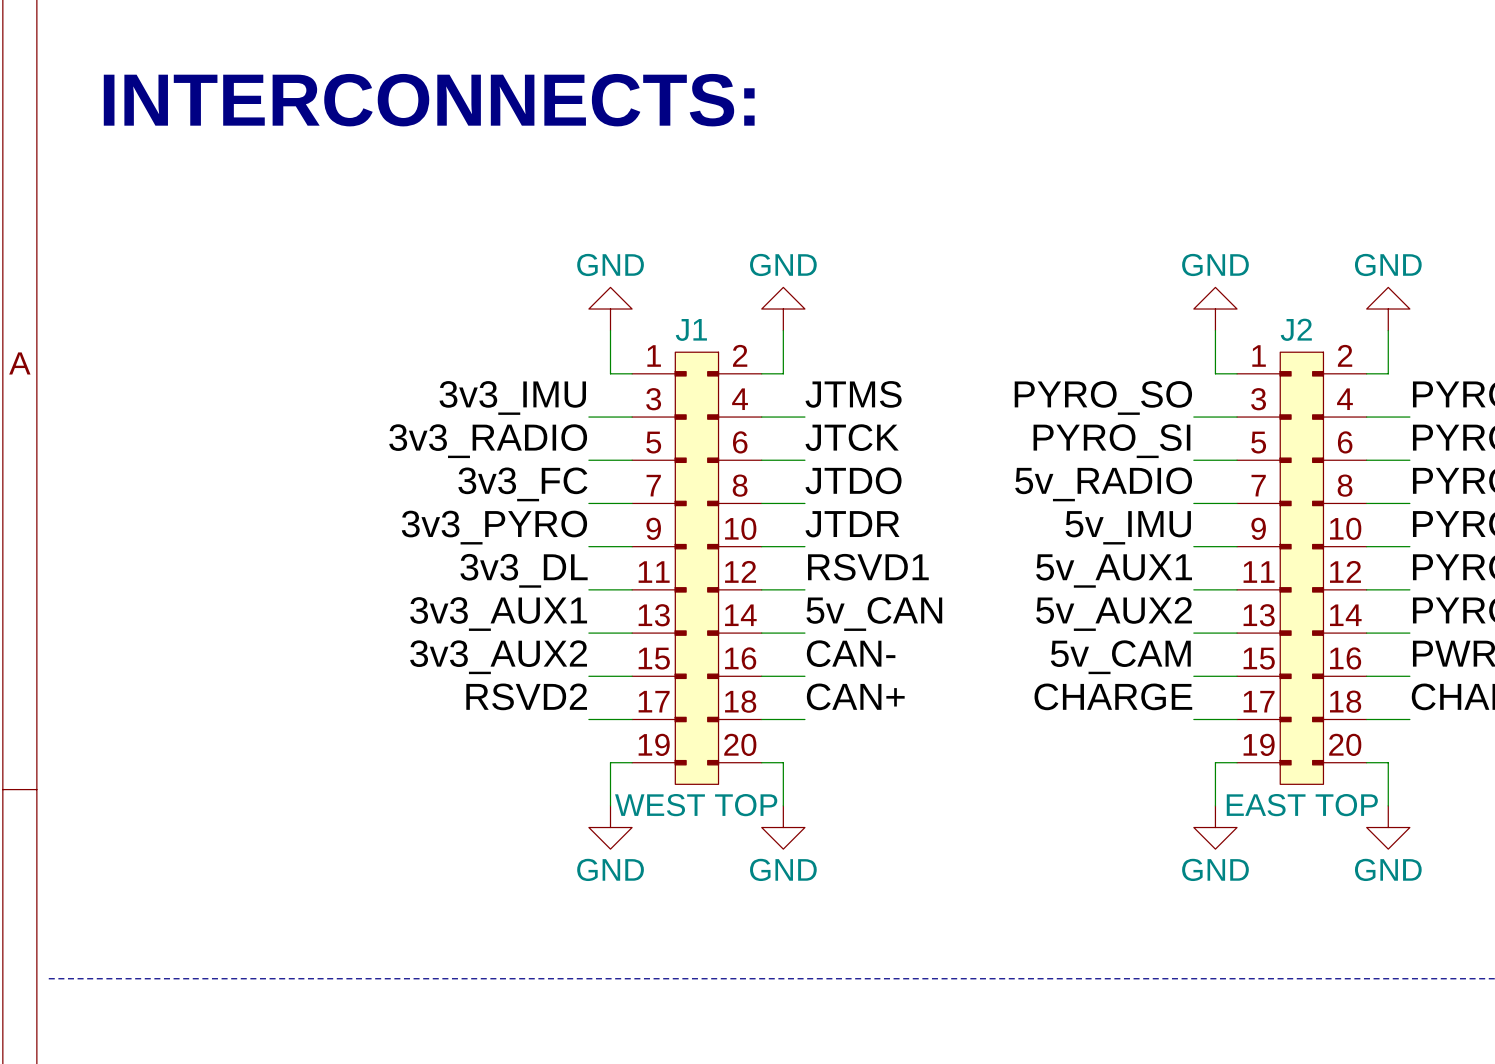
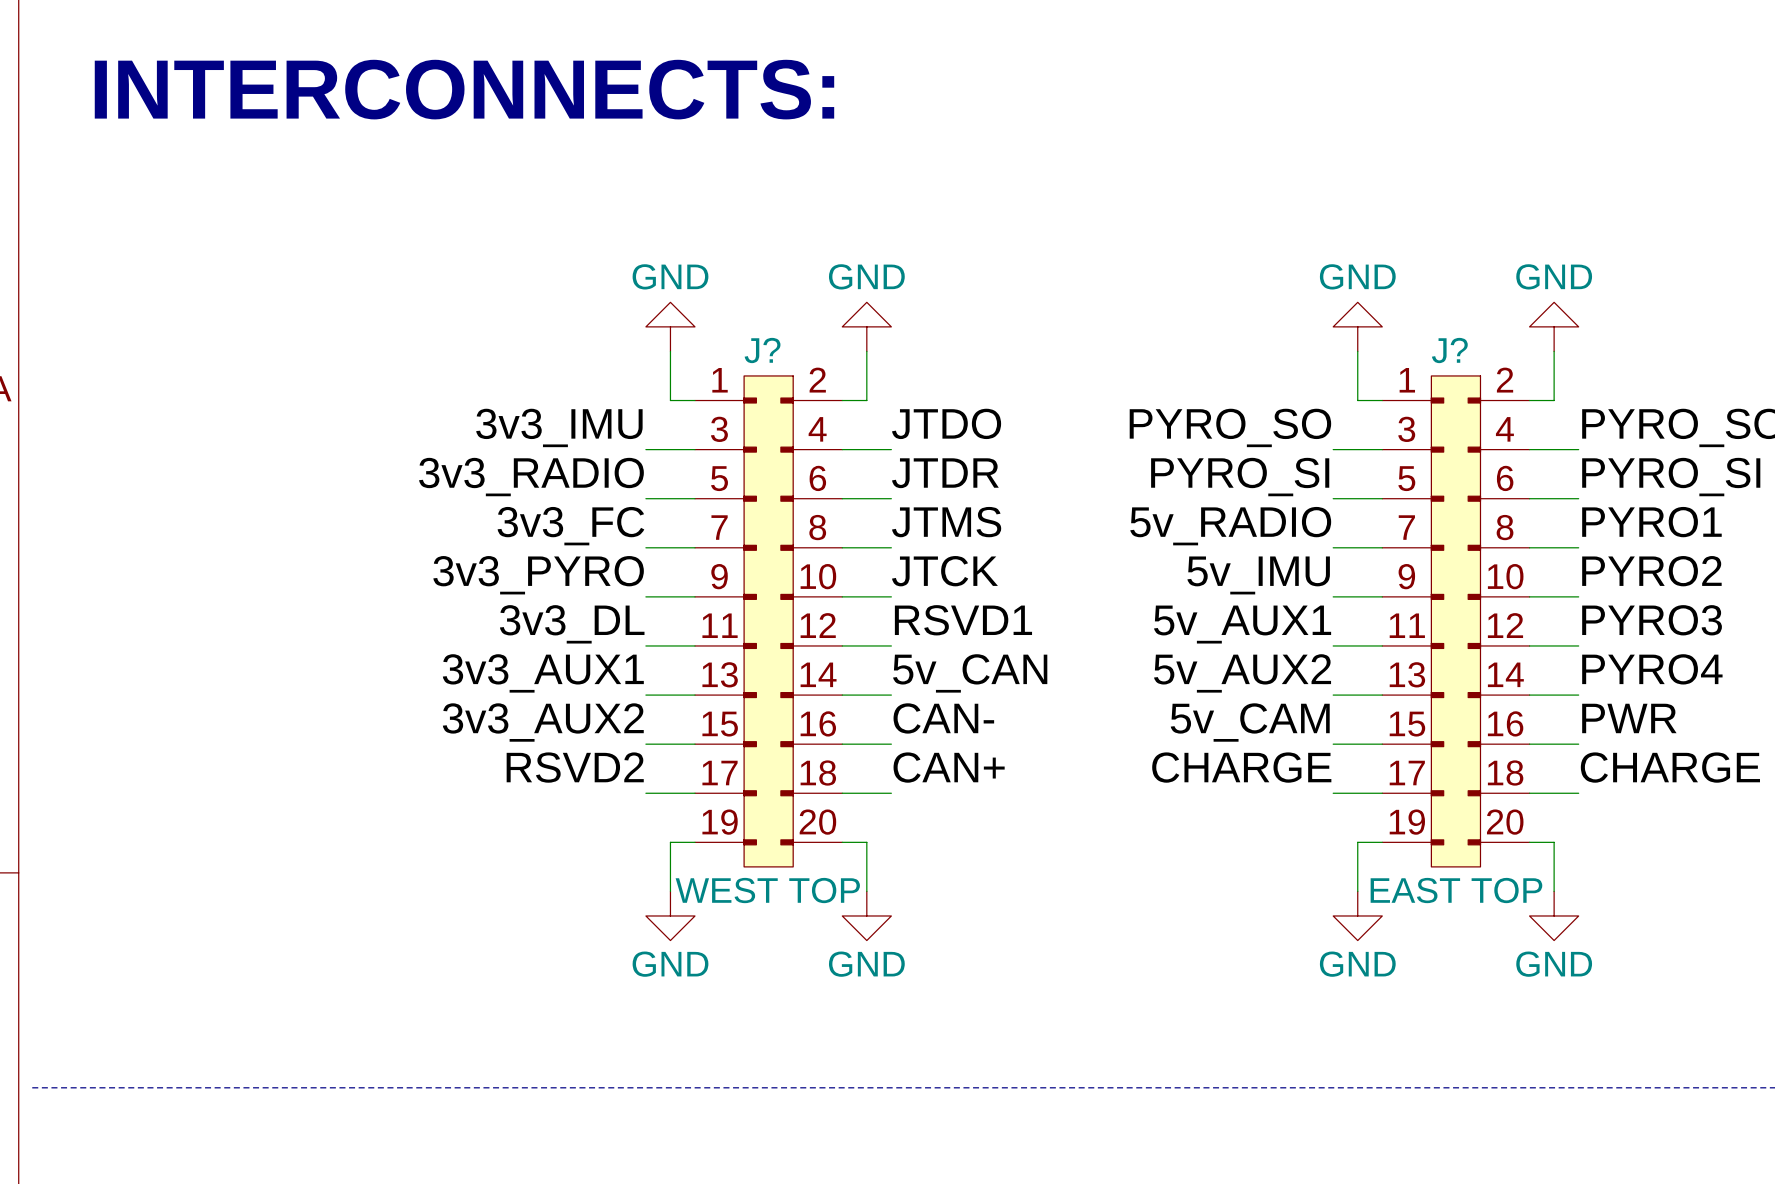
J1 name: J1 (691, 329) -> J? (762, 350)
J2 name: J2 (1296, 329) -> J? (1449, 350)
label: JTMS (853, 394) -> JTDO (946, 423)
label: JTCK (852, 437) -> JTDR (945, 473)
label: JTDO (853, 480) -> JTMS (946, 522)
label: JTDR (852, 524) -> JTCK (944, 571)

